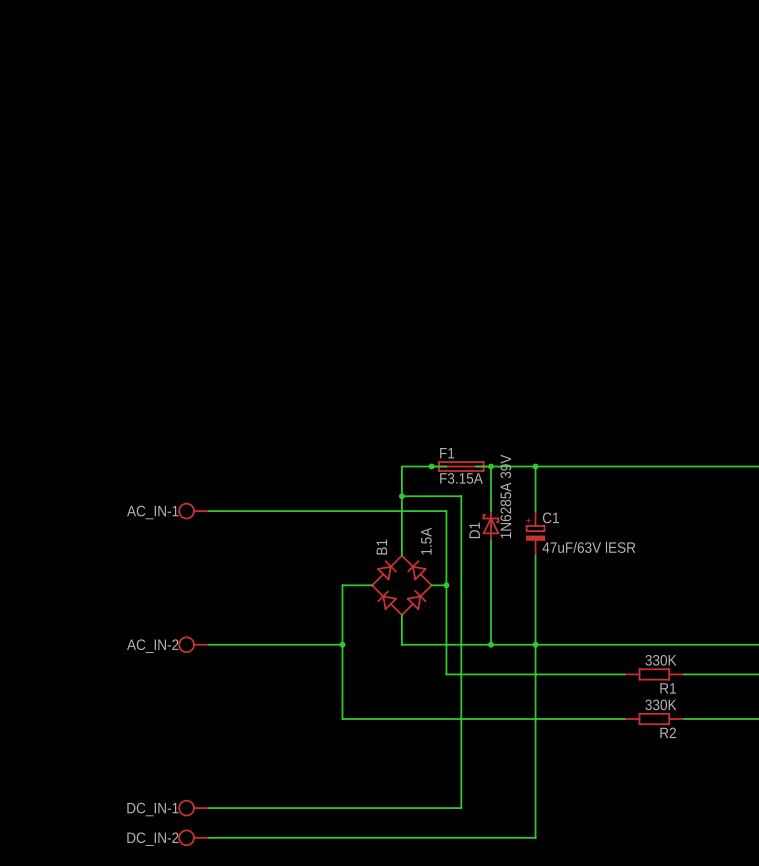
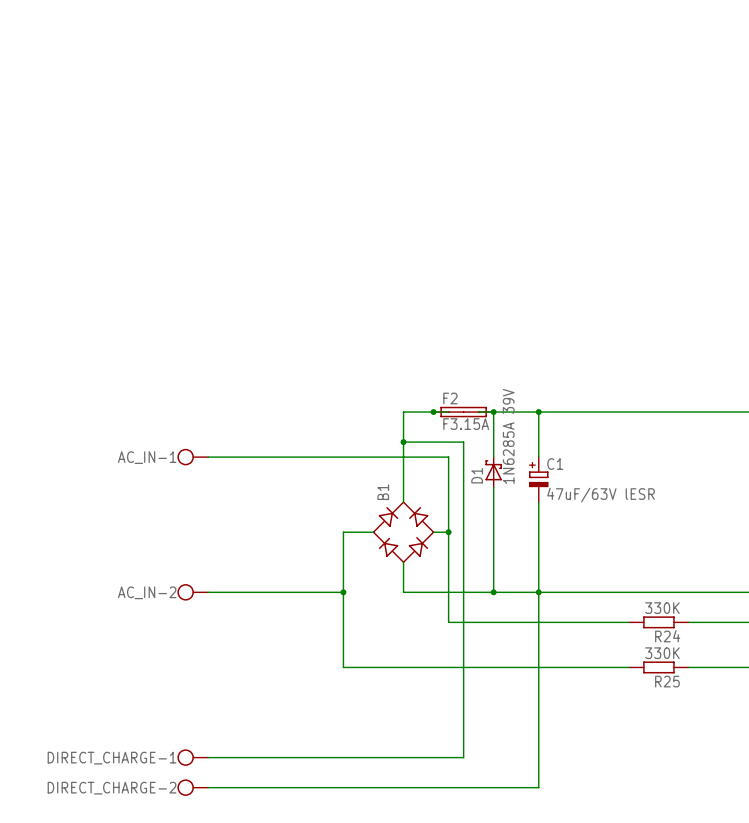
F1 name: F1 (447, 453) -> F2 (450, 398)
B1 value: 1.5A (426, 541) -> none
R1 name: R1 (668, 688) -> R24 (667, 636)
R2 name: R2 (668, 732) -> R25 (667, 681)
DC_IN-1 name: DC_IN-1 (152, 809) -> DIRECT_CHARGE-1 (112, 758)
DC_IN-2 name: DC_IN-2 (152, 839) -> DIRECT_CHARGE-2 (112, 788)

